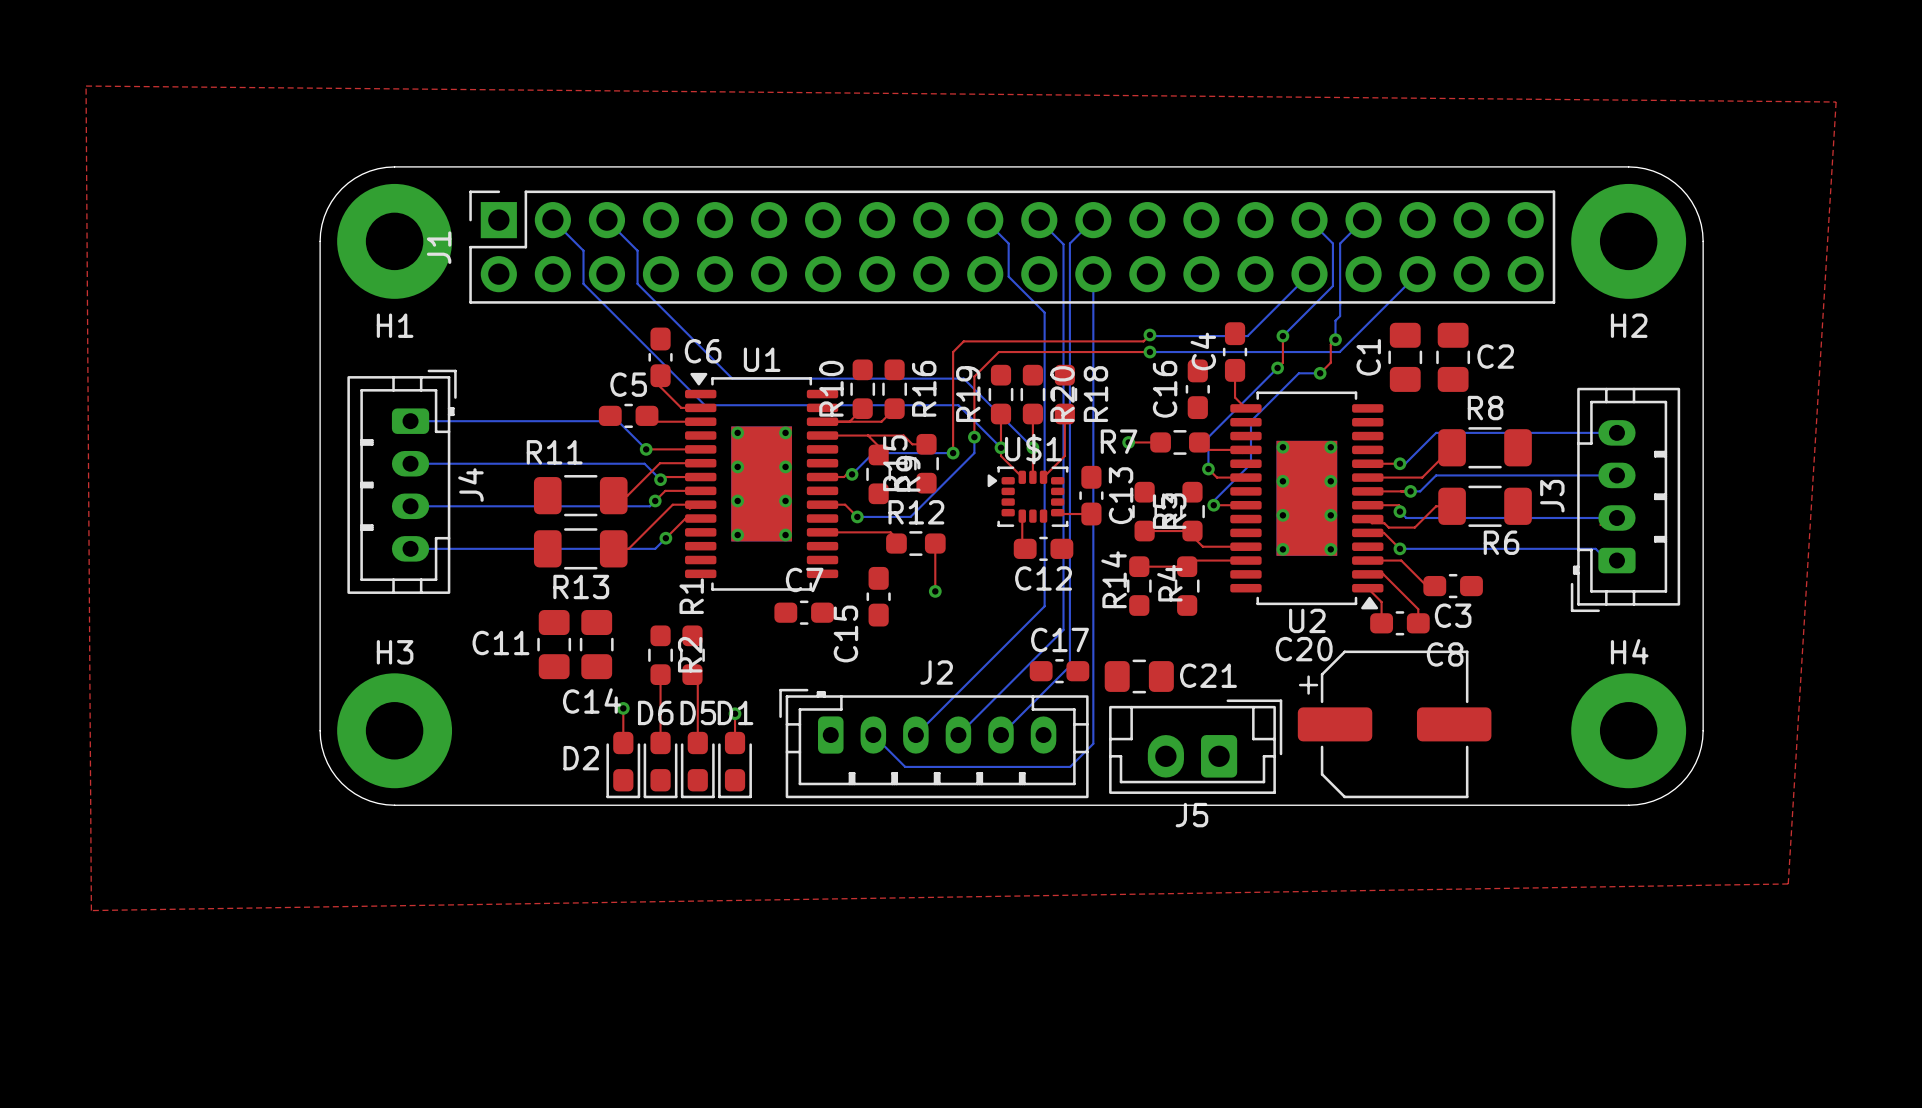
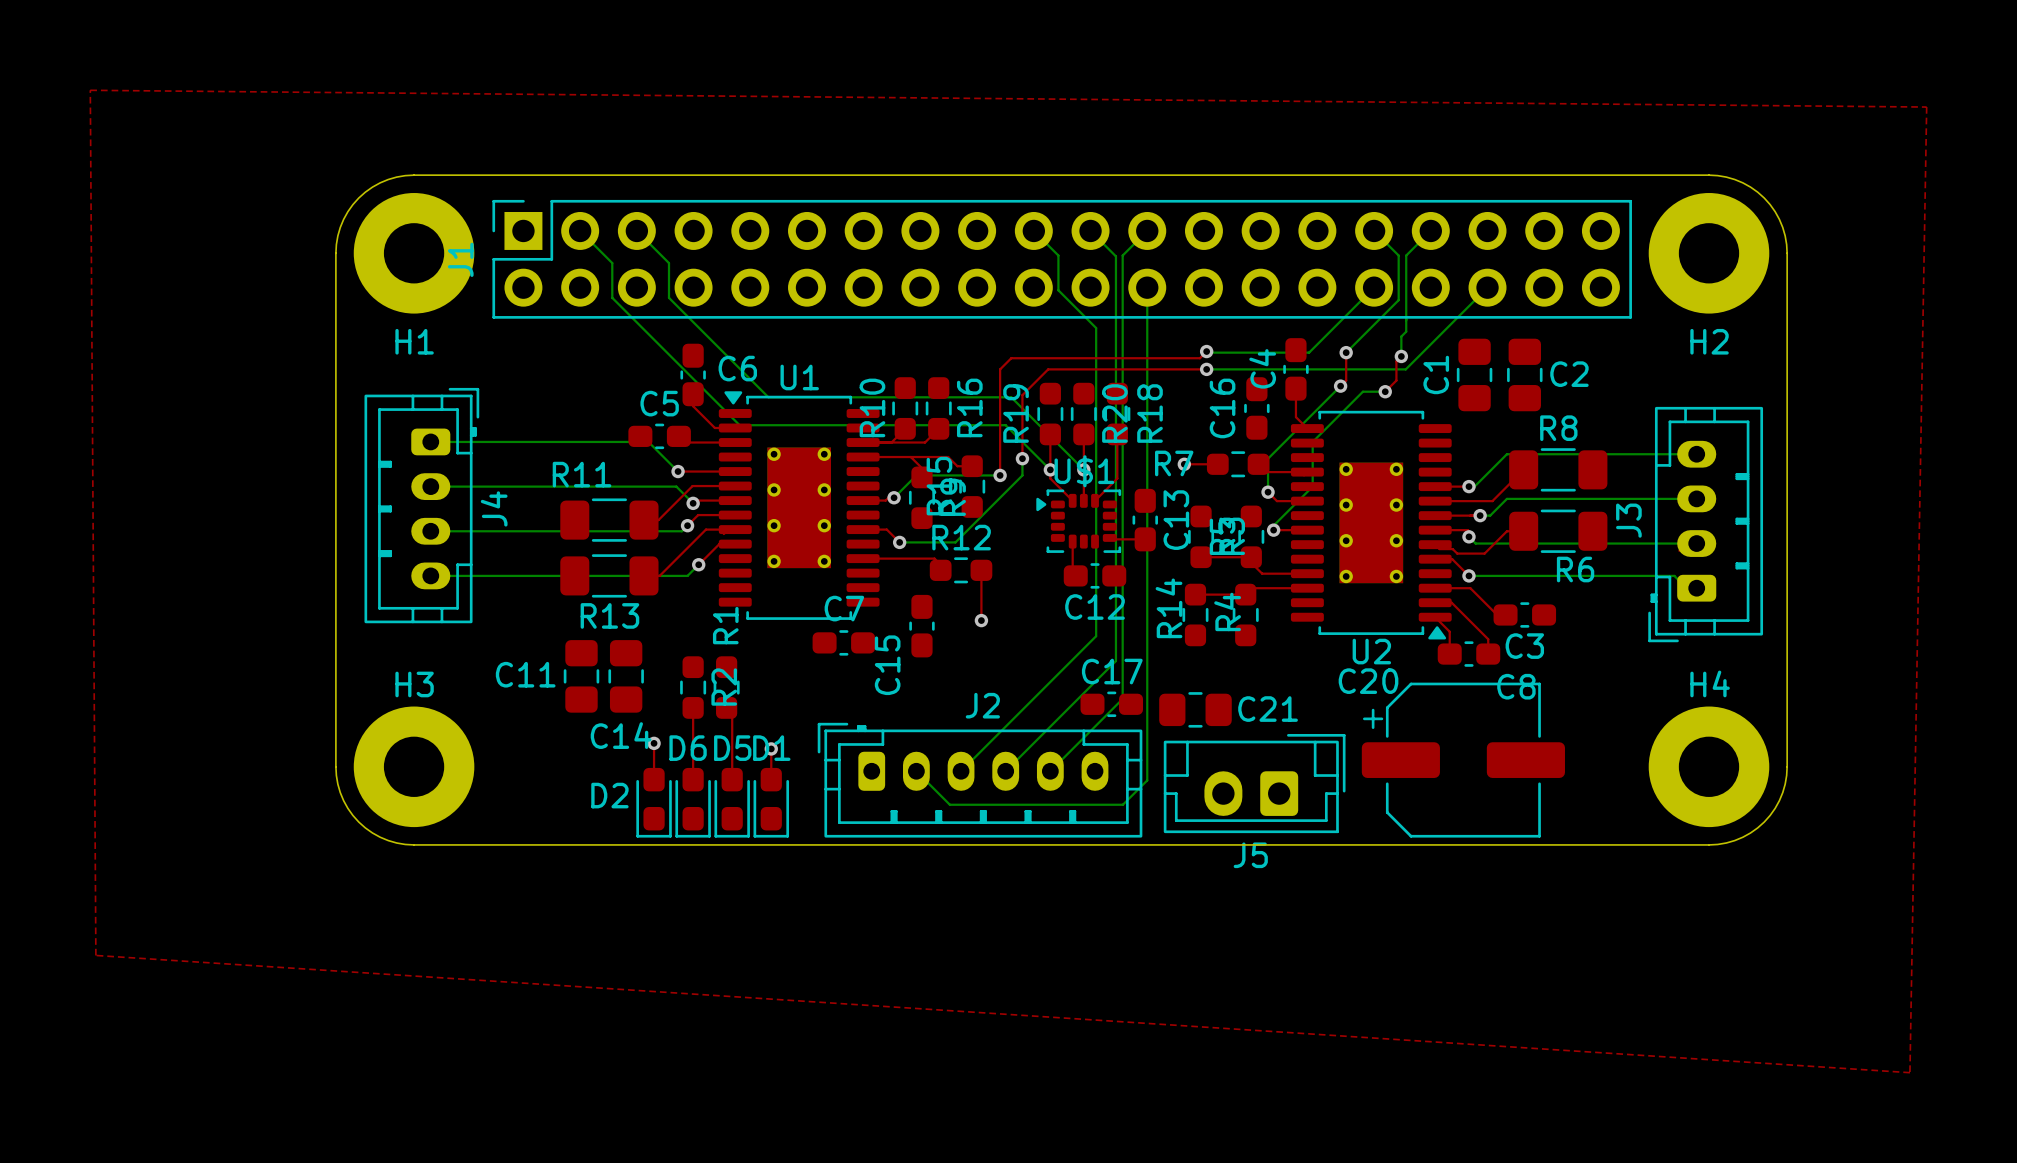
top zone outline: (1836, 102) (1788, 883) (91, 910) -> (1926, 107) (1909, 1072) (95, 955)

